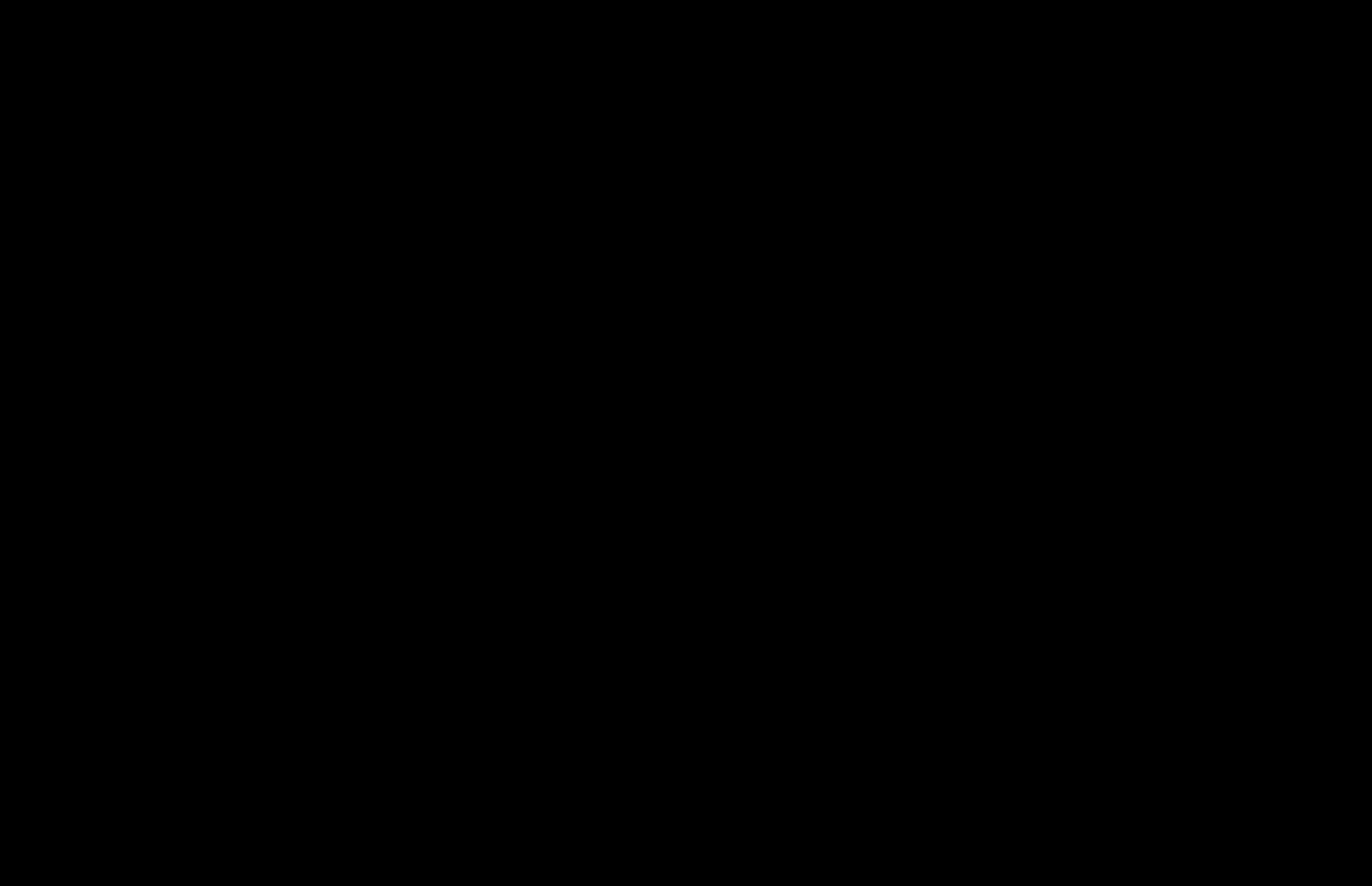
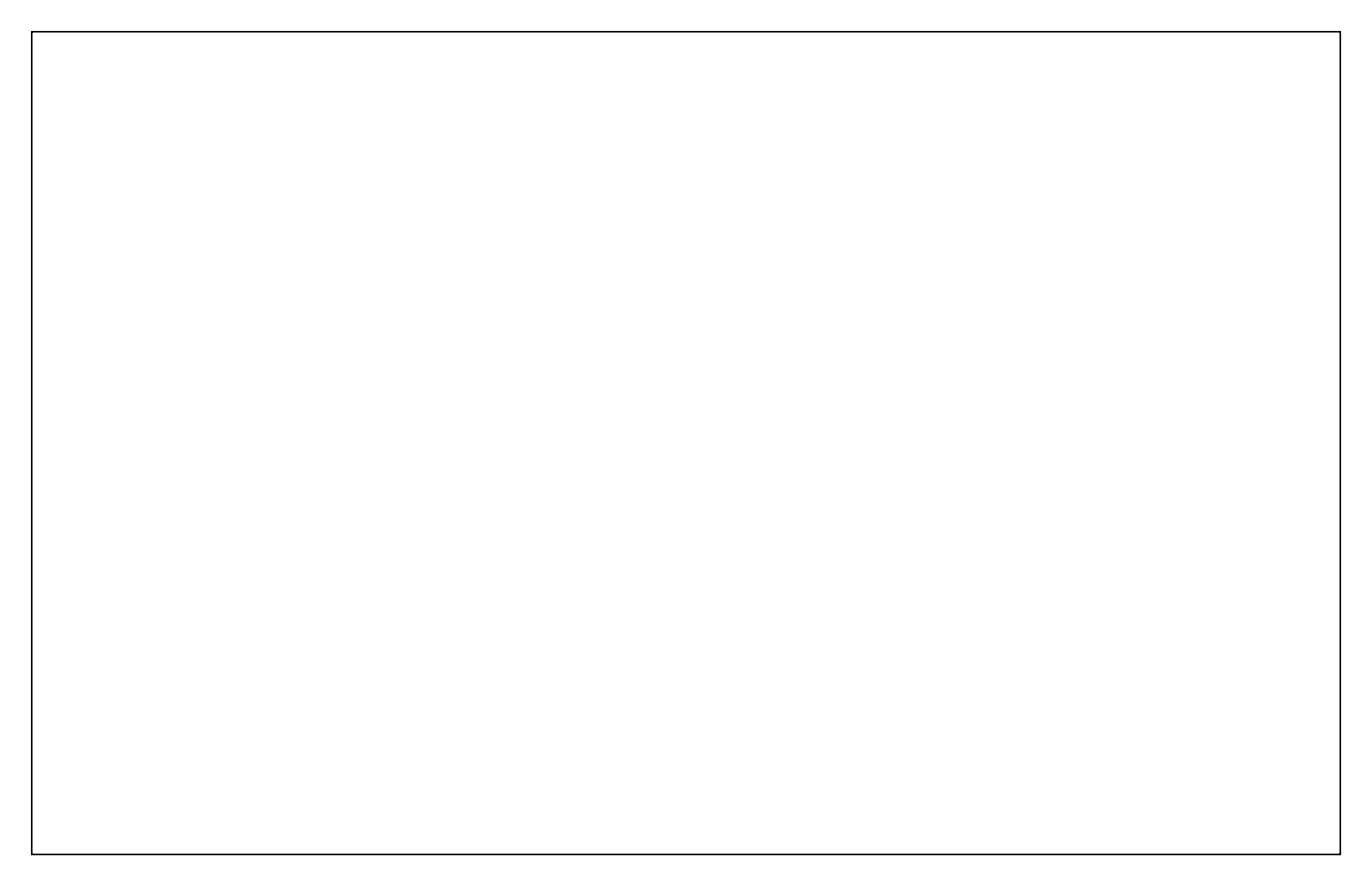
board edge: none -> (1340, 31) (31, 31) (31, 854) (1340, 854) (1340, 31)

